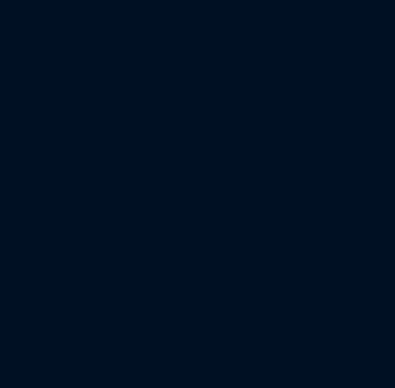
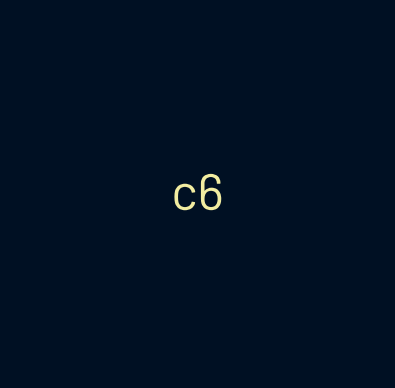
text: none -> c6 (197, 192)

